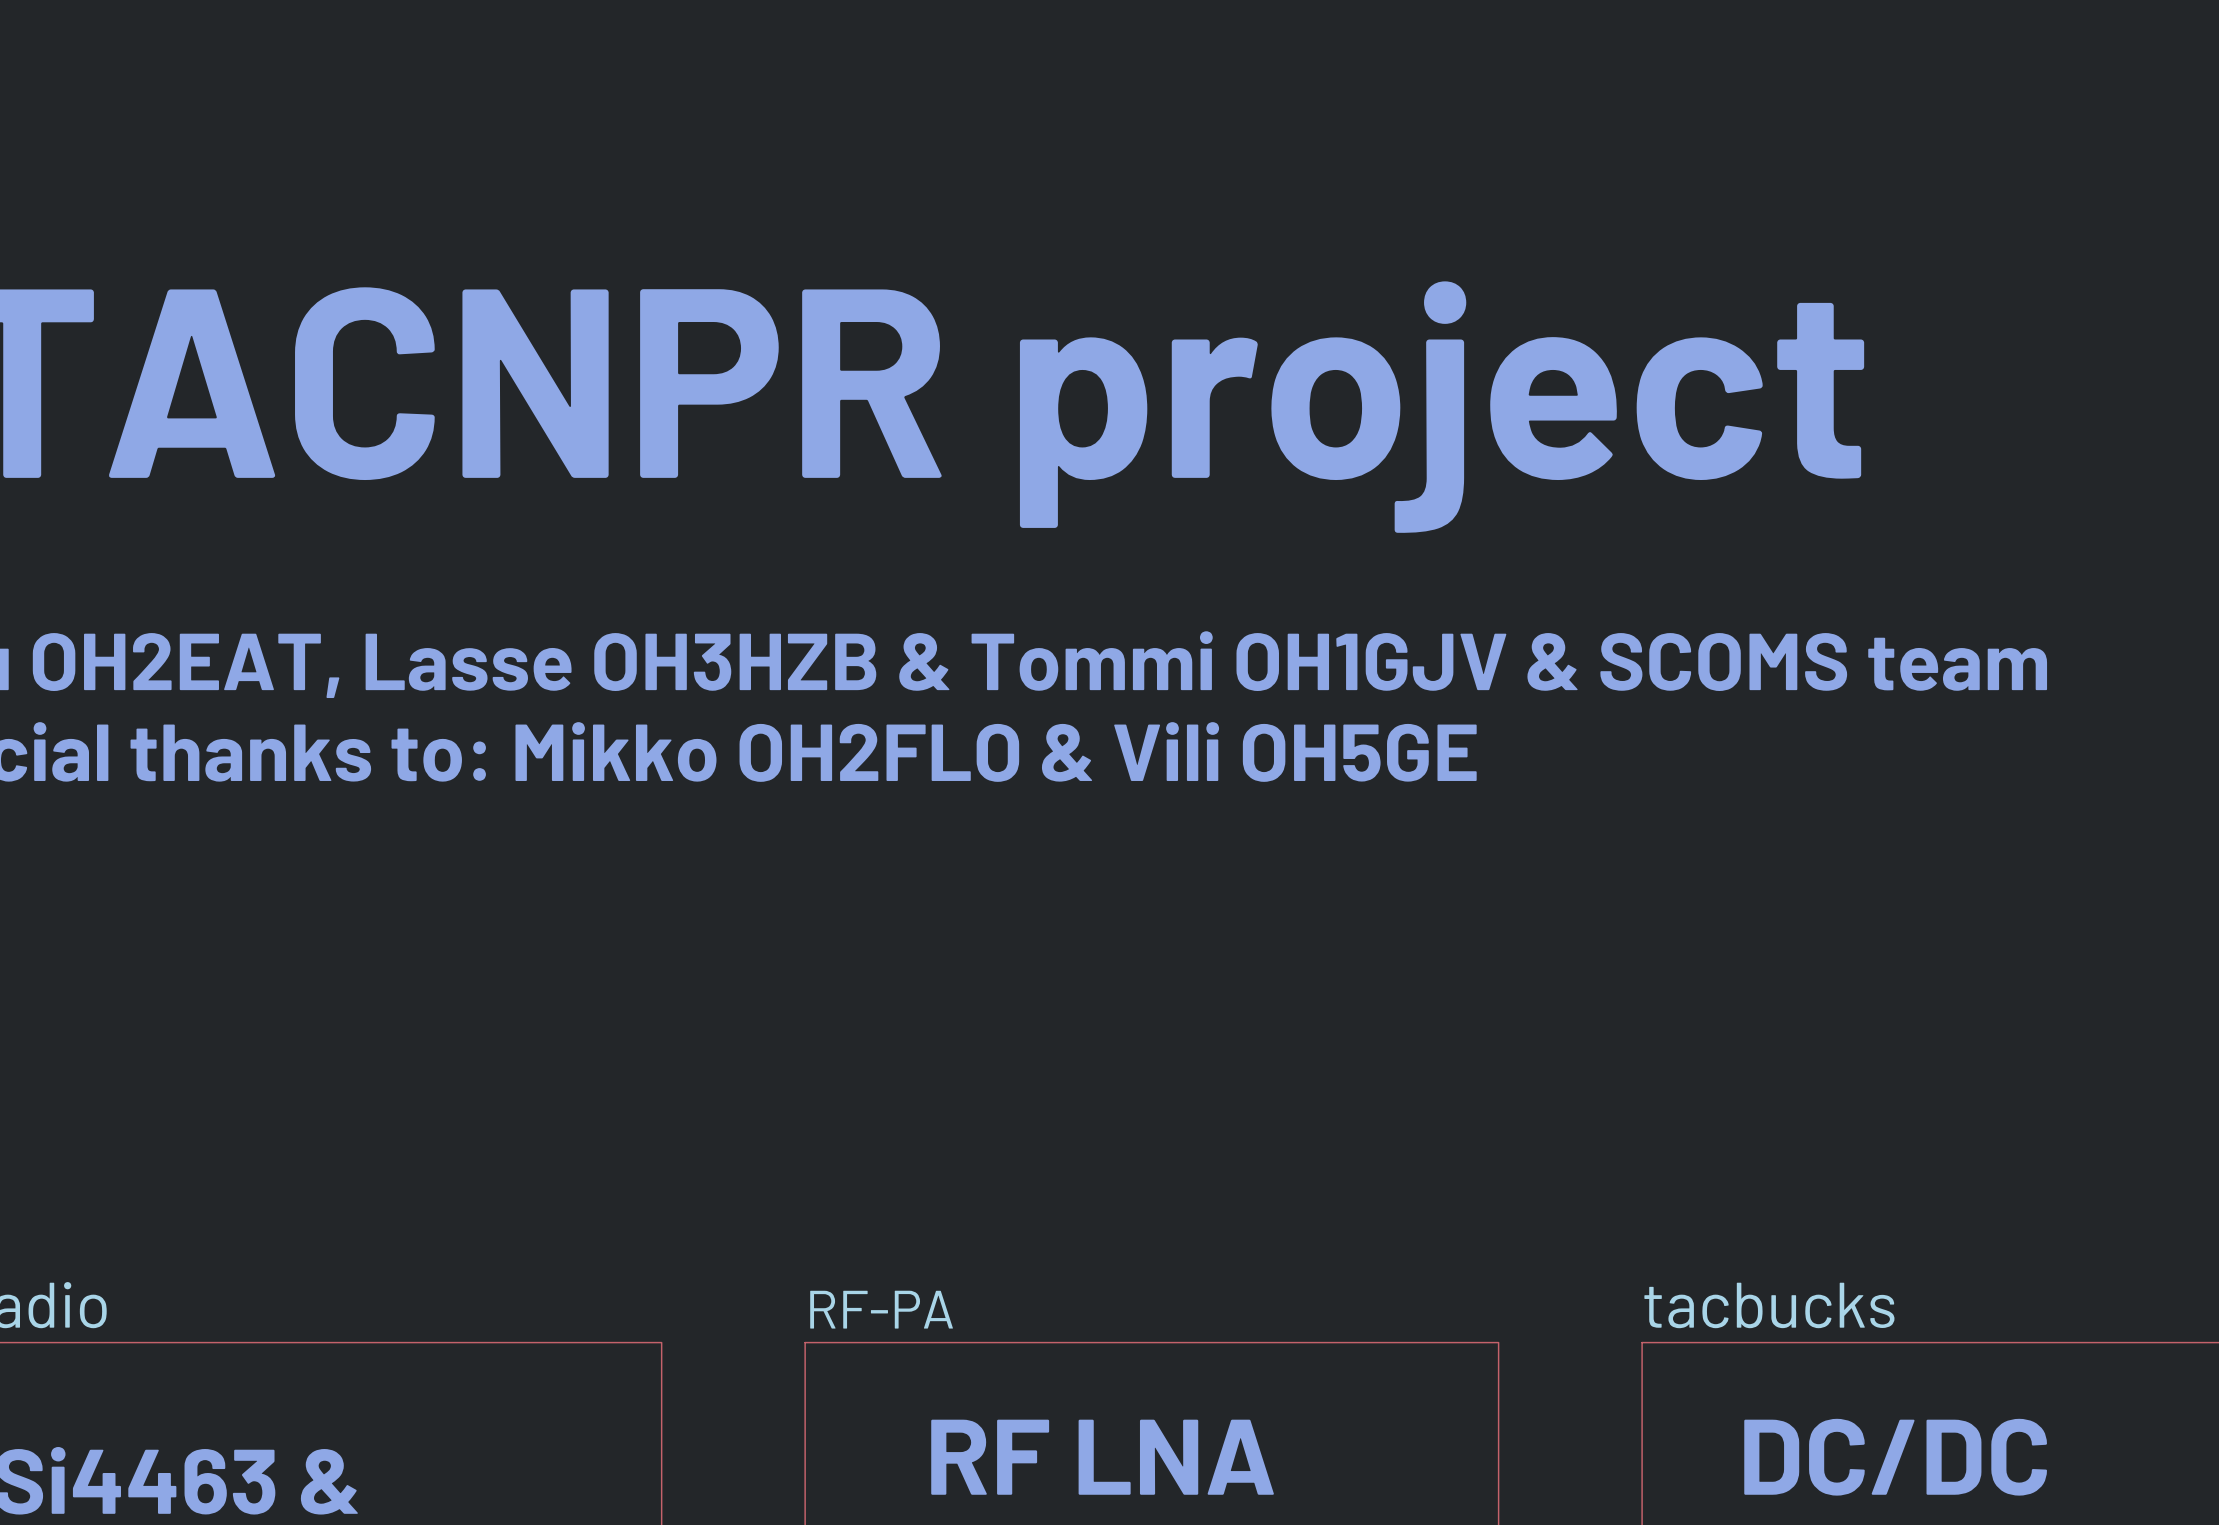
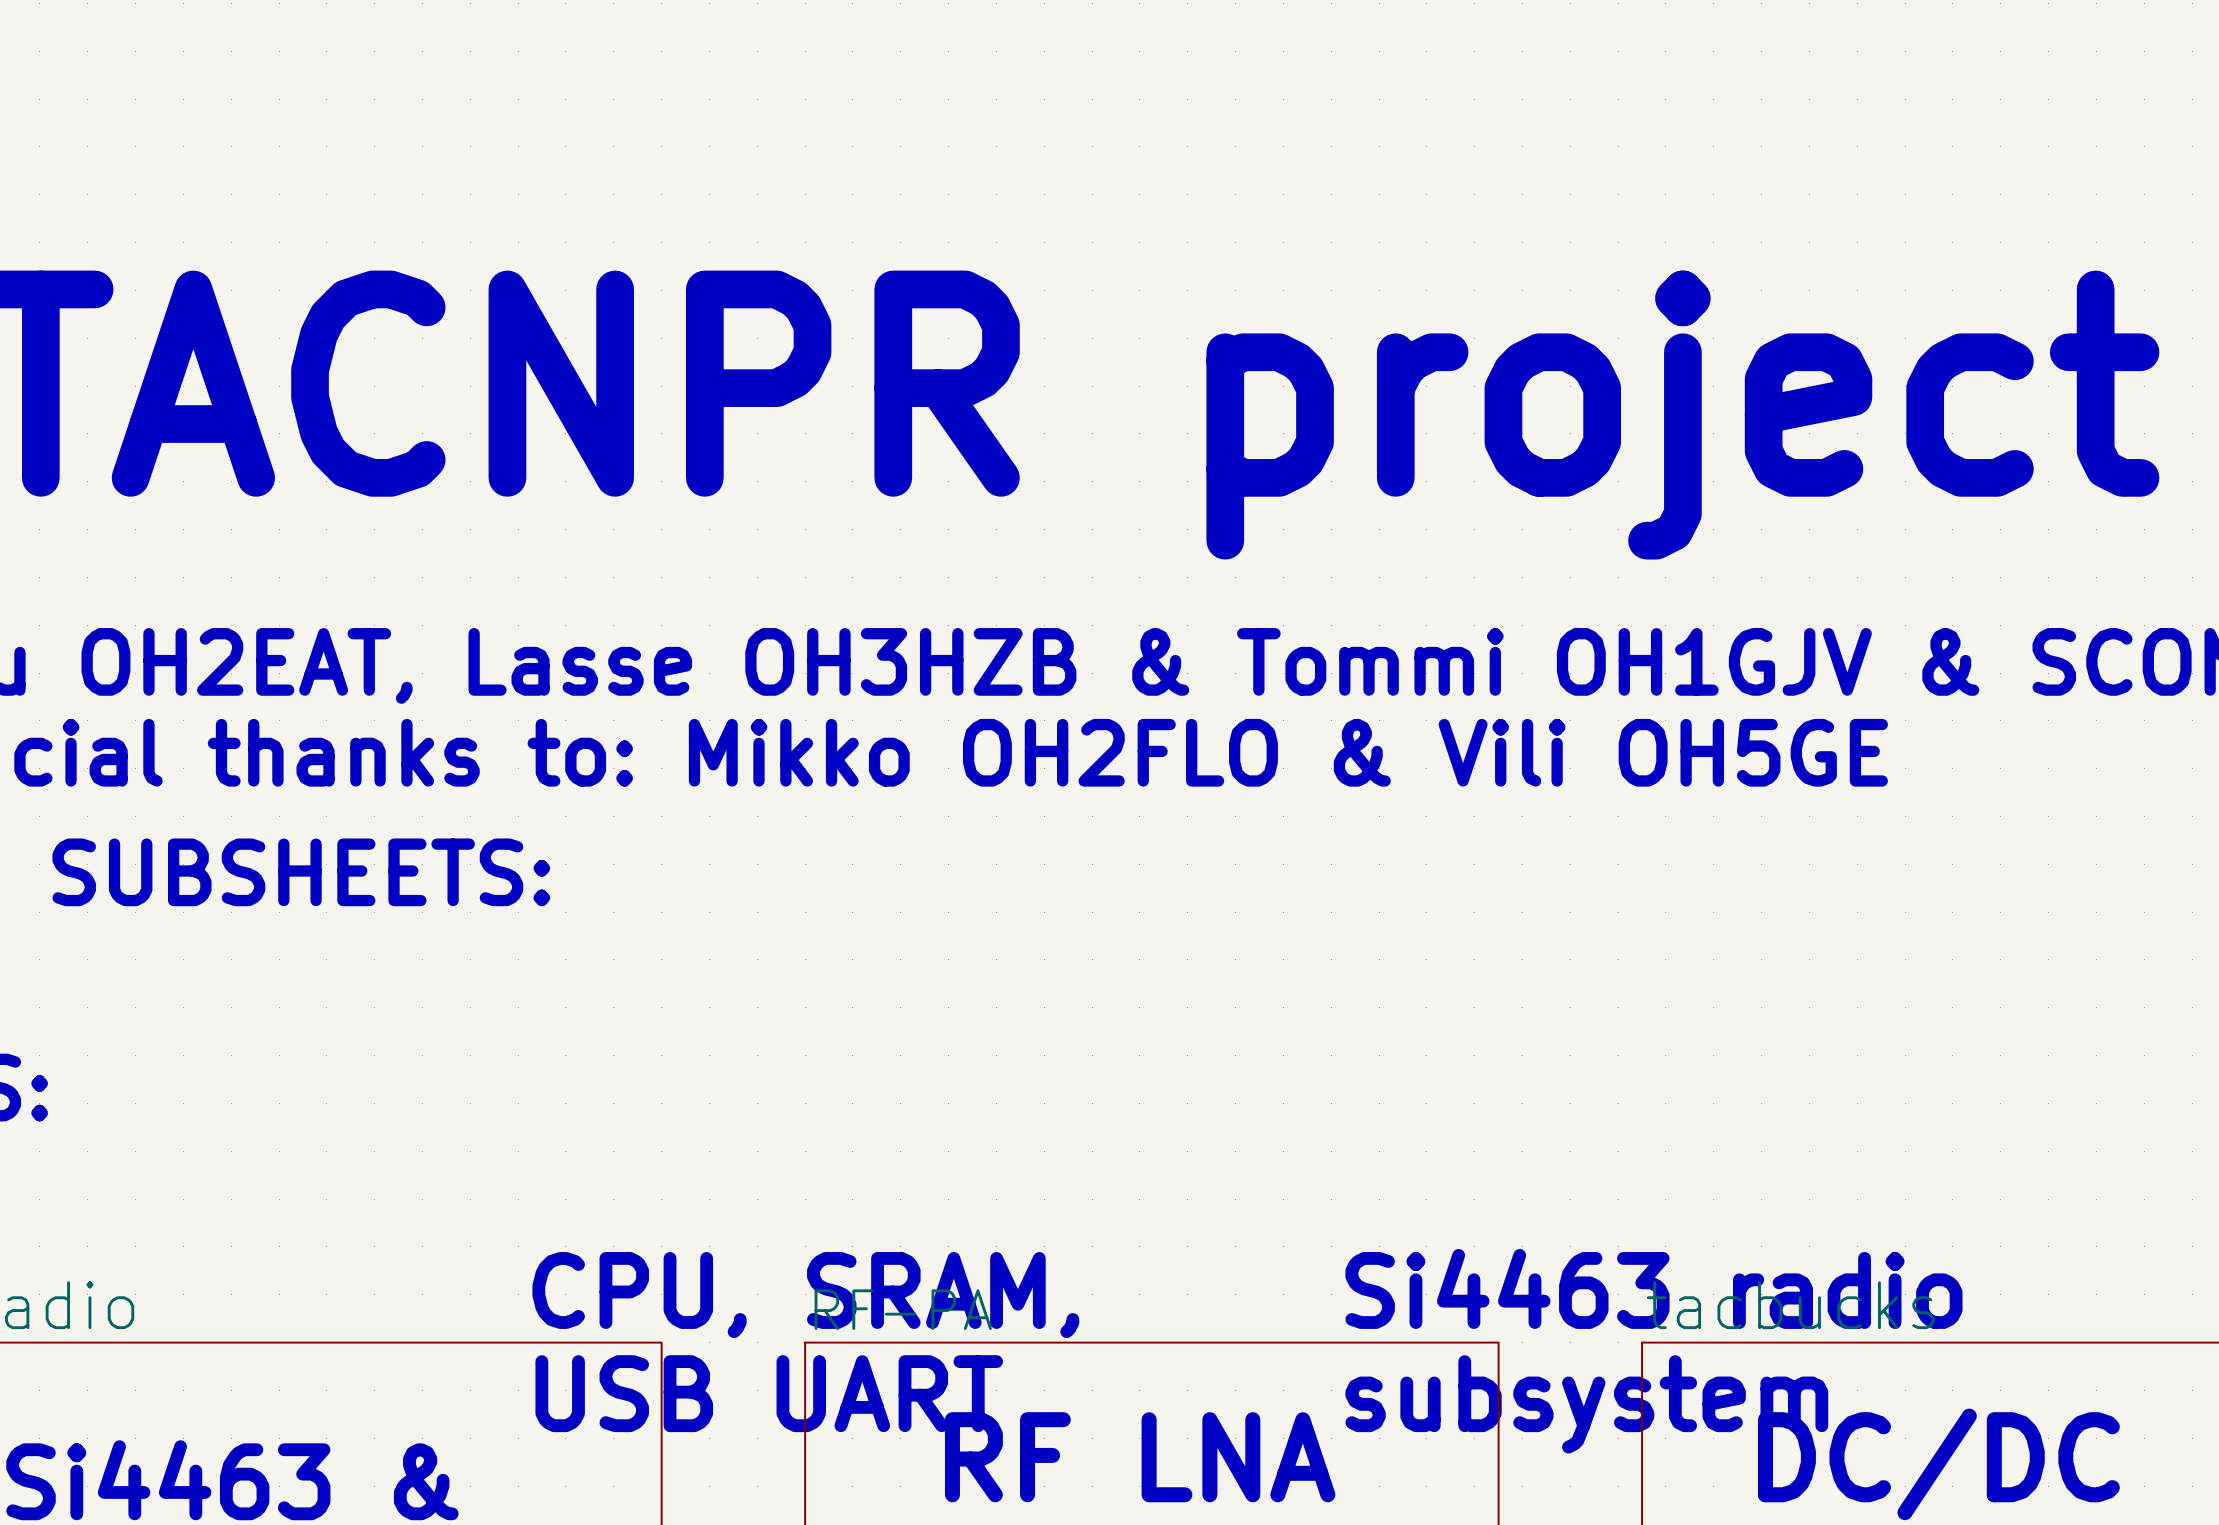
text: none -> SUBSHEETS: (301, 872)
text: none -> Si4463 radio (1653, 1288)
text: none -> CPU, SRAM, (805, 1295)
text: none -> USB UART (769, 1393)
text: none -> subsystem (1586, 1404)

